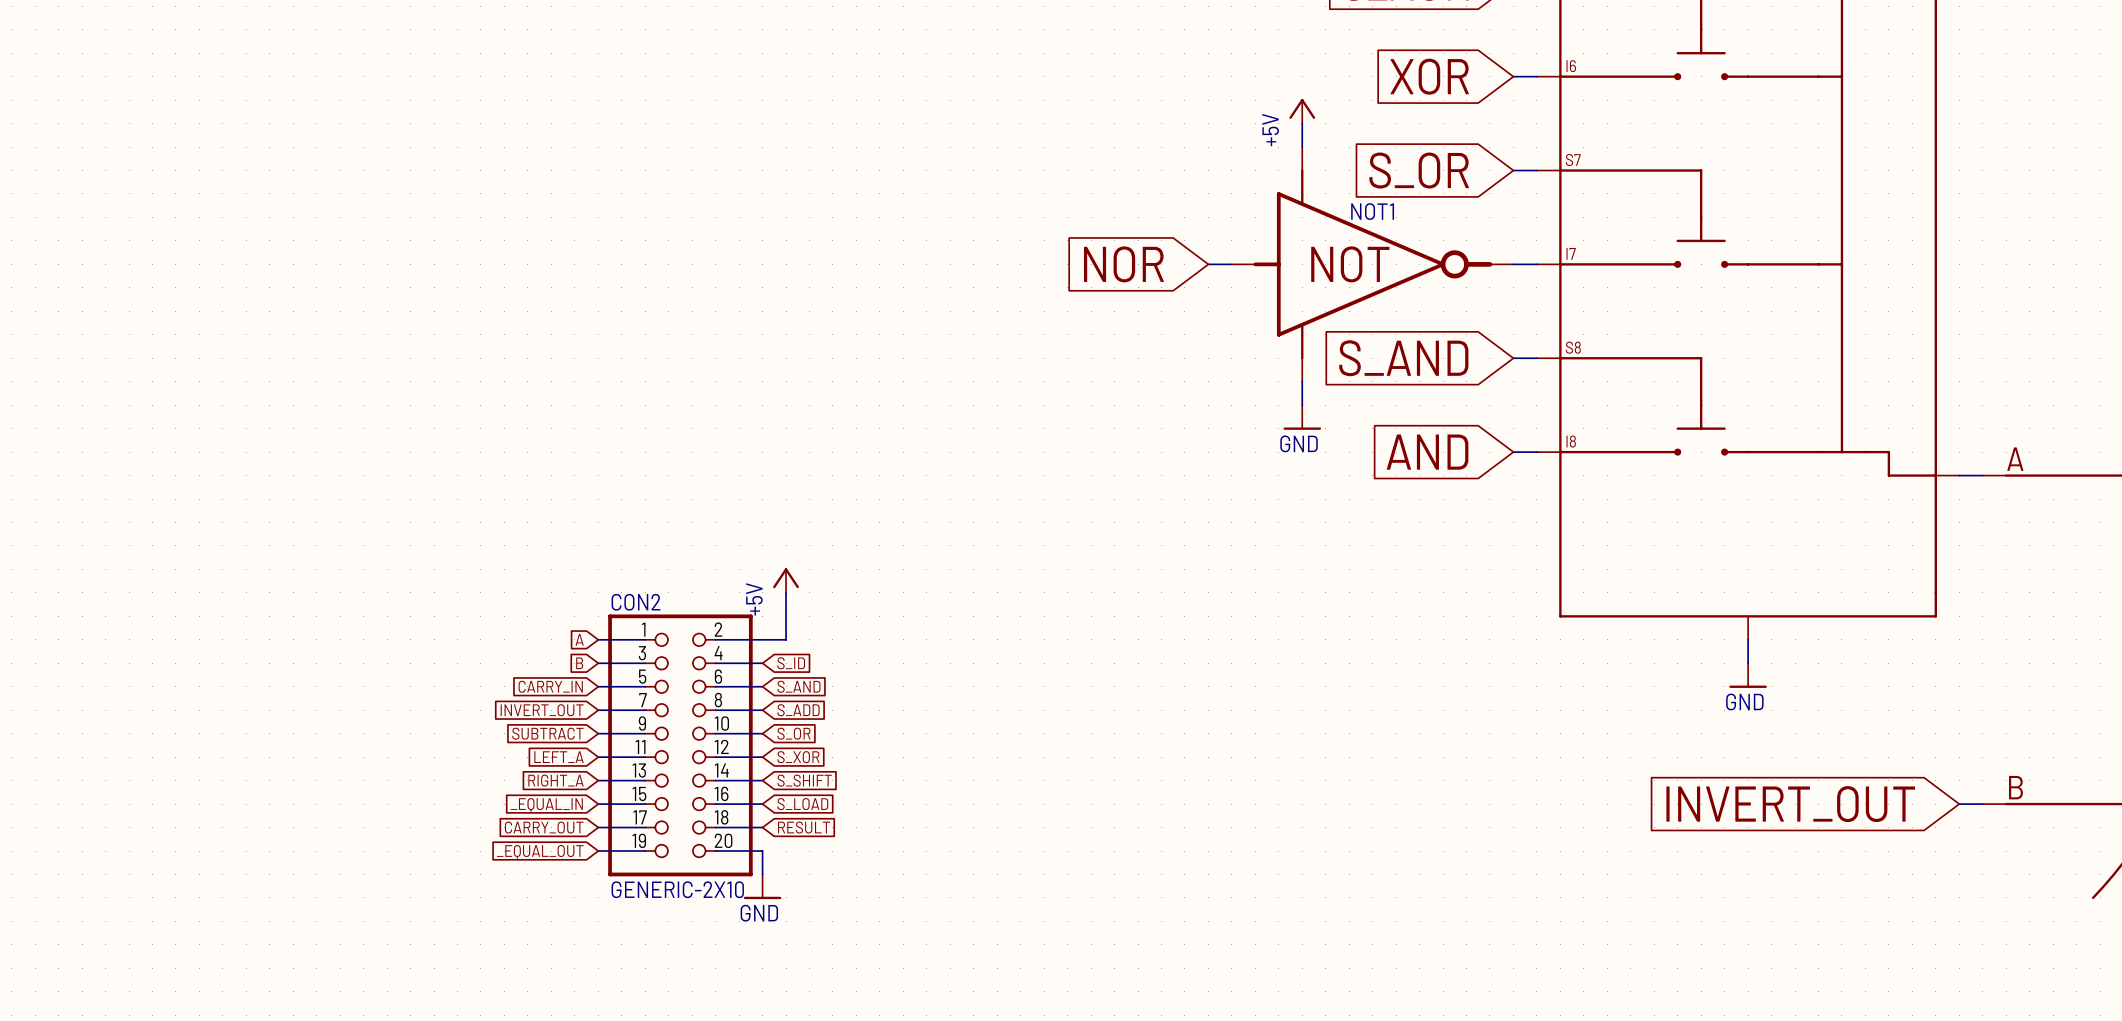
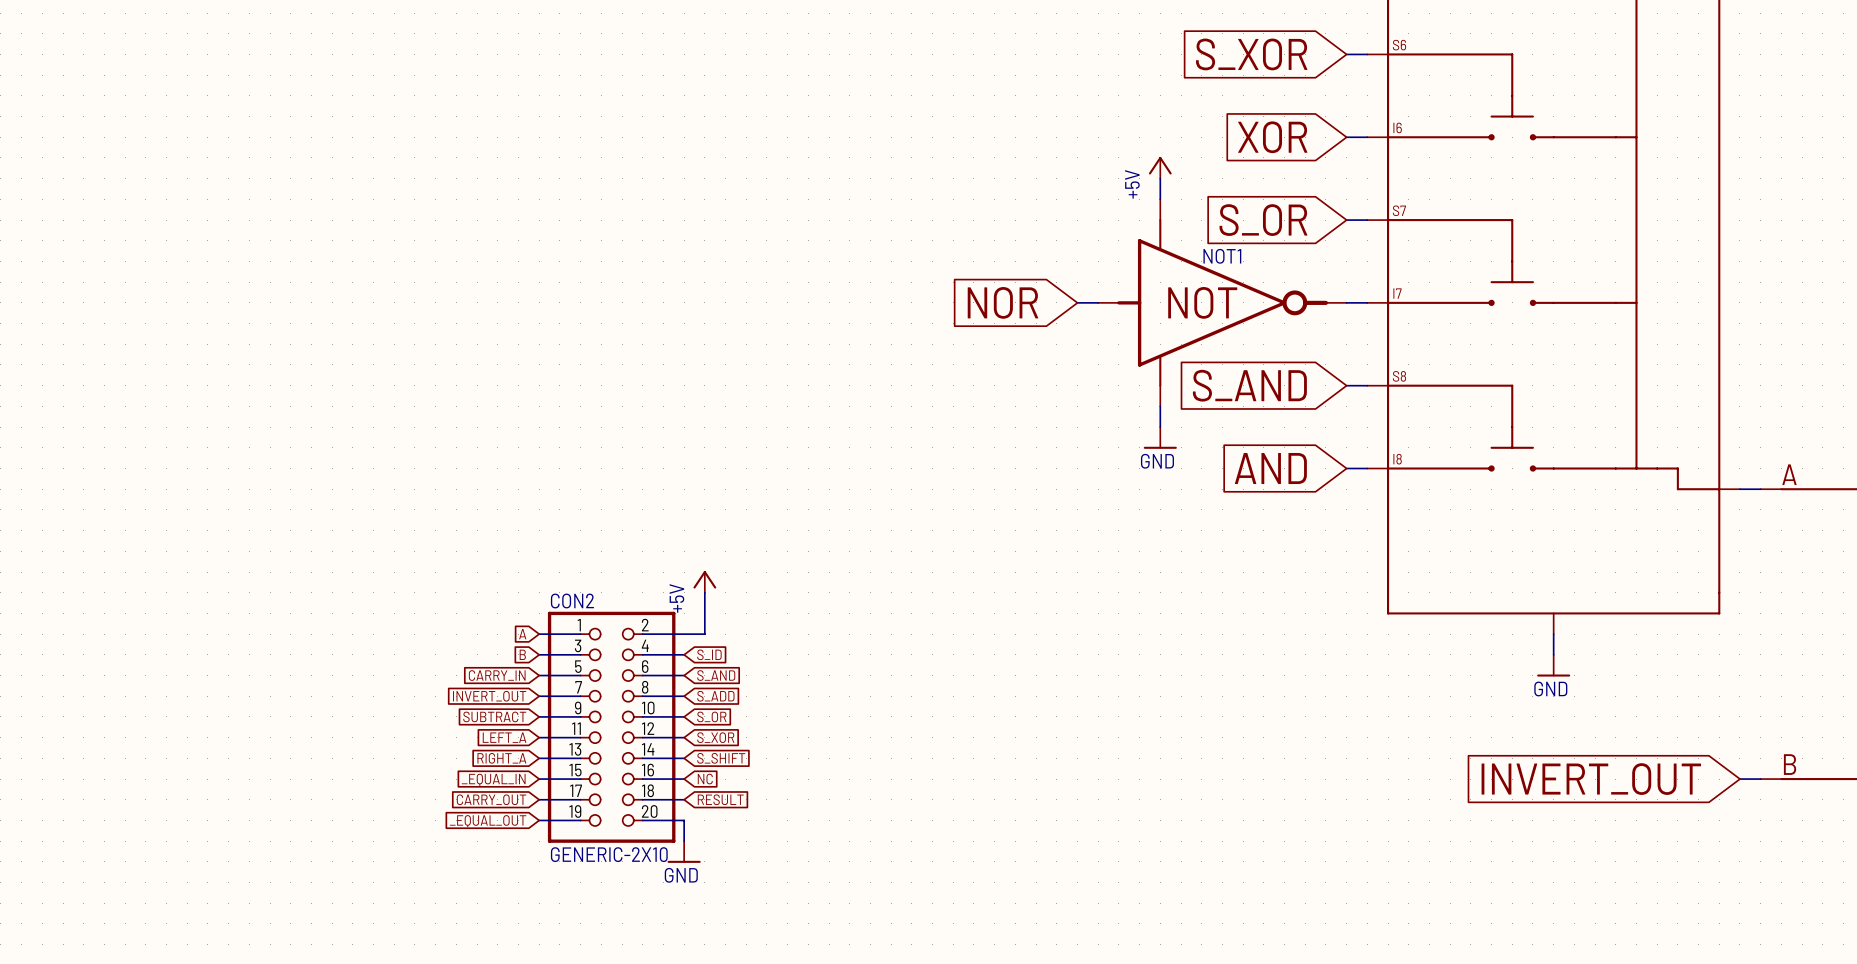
global label: S_LOAD (802, 804) -> NC (705, 779)

